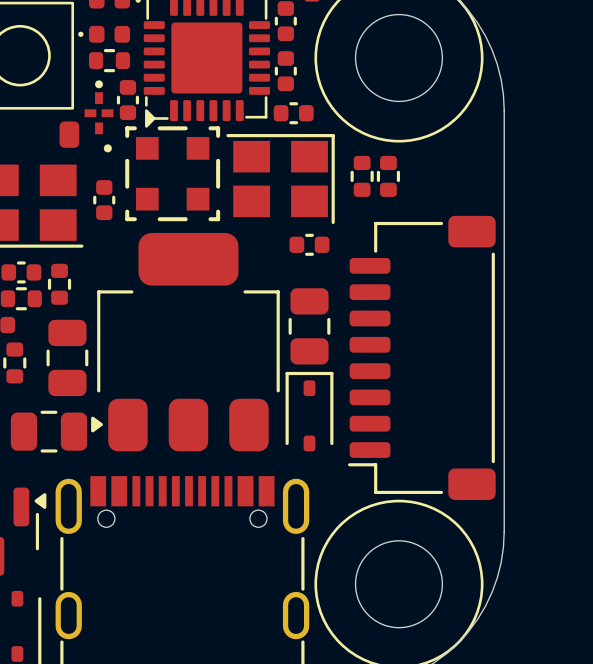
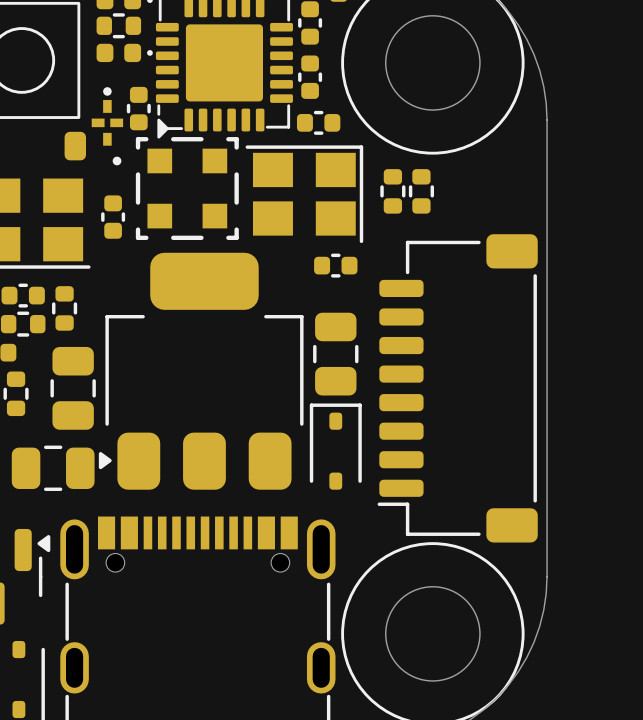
part rotation: 0° (104, 34) -> 180° (124, 52)
part position: (109, 60) -> (118, 25)

